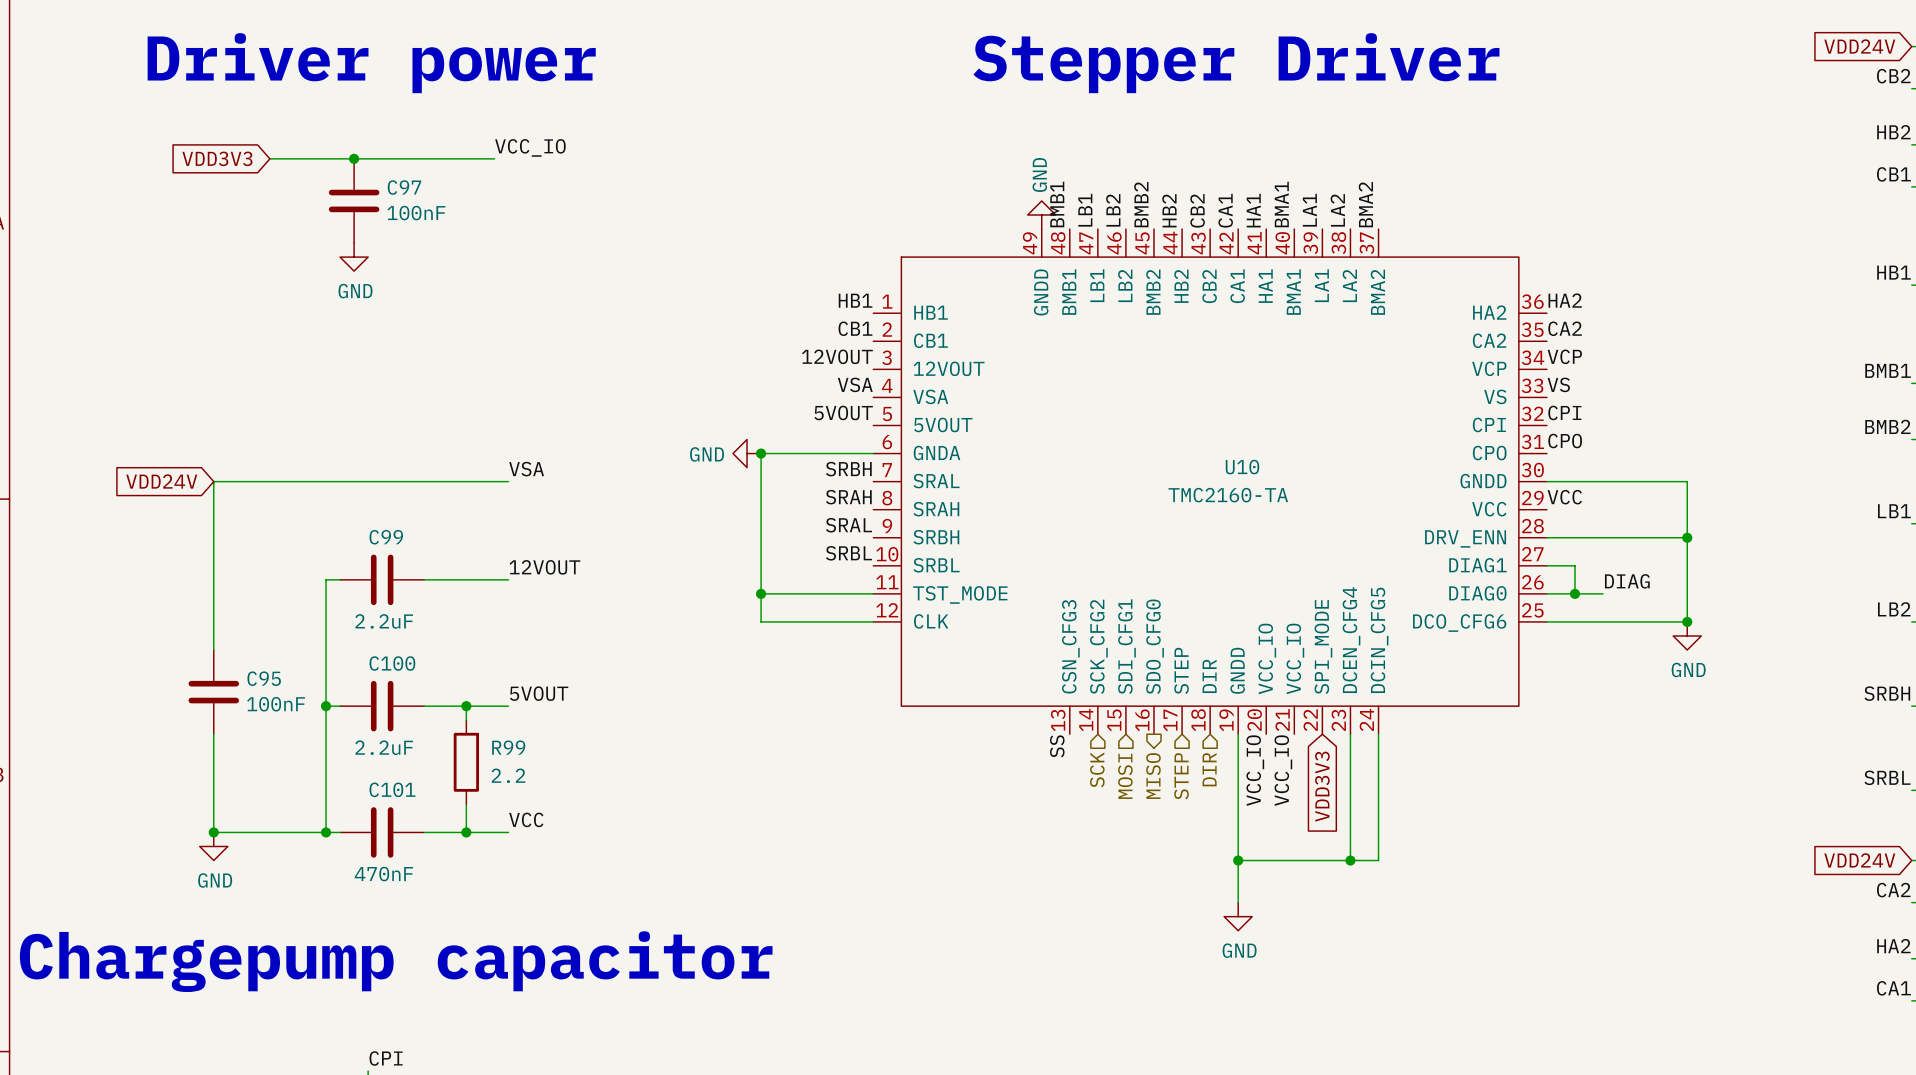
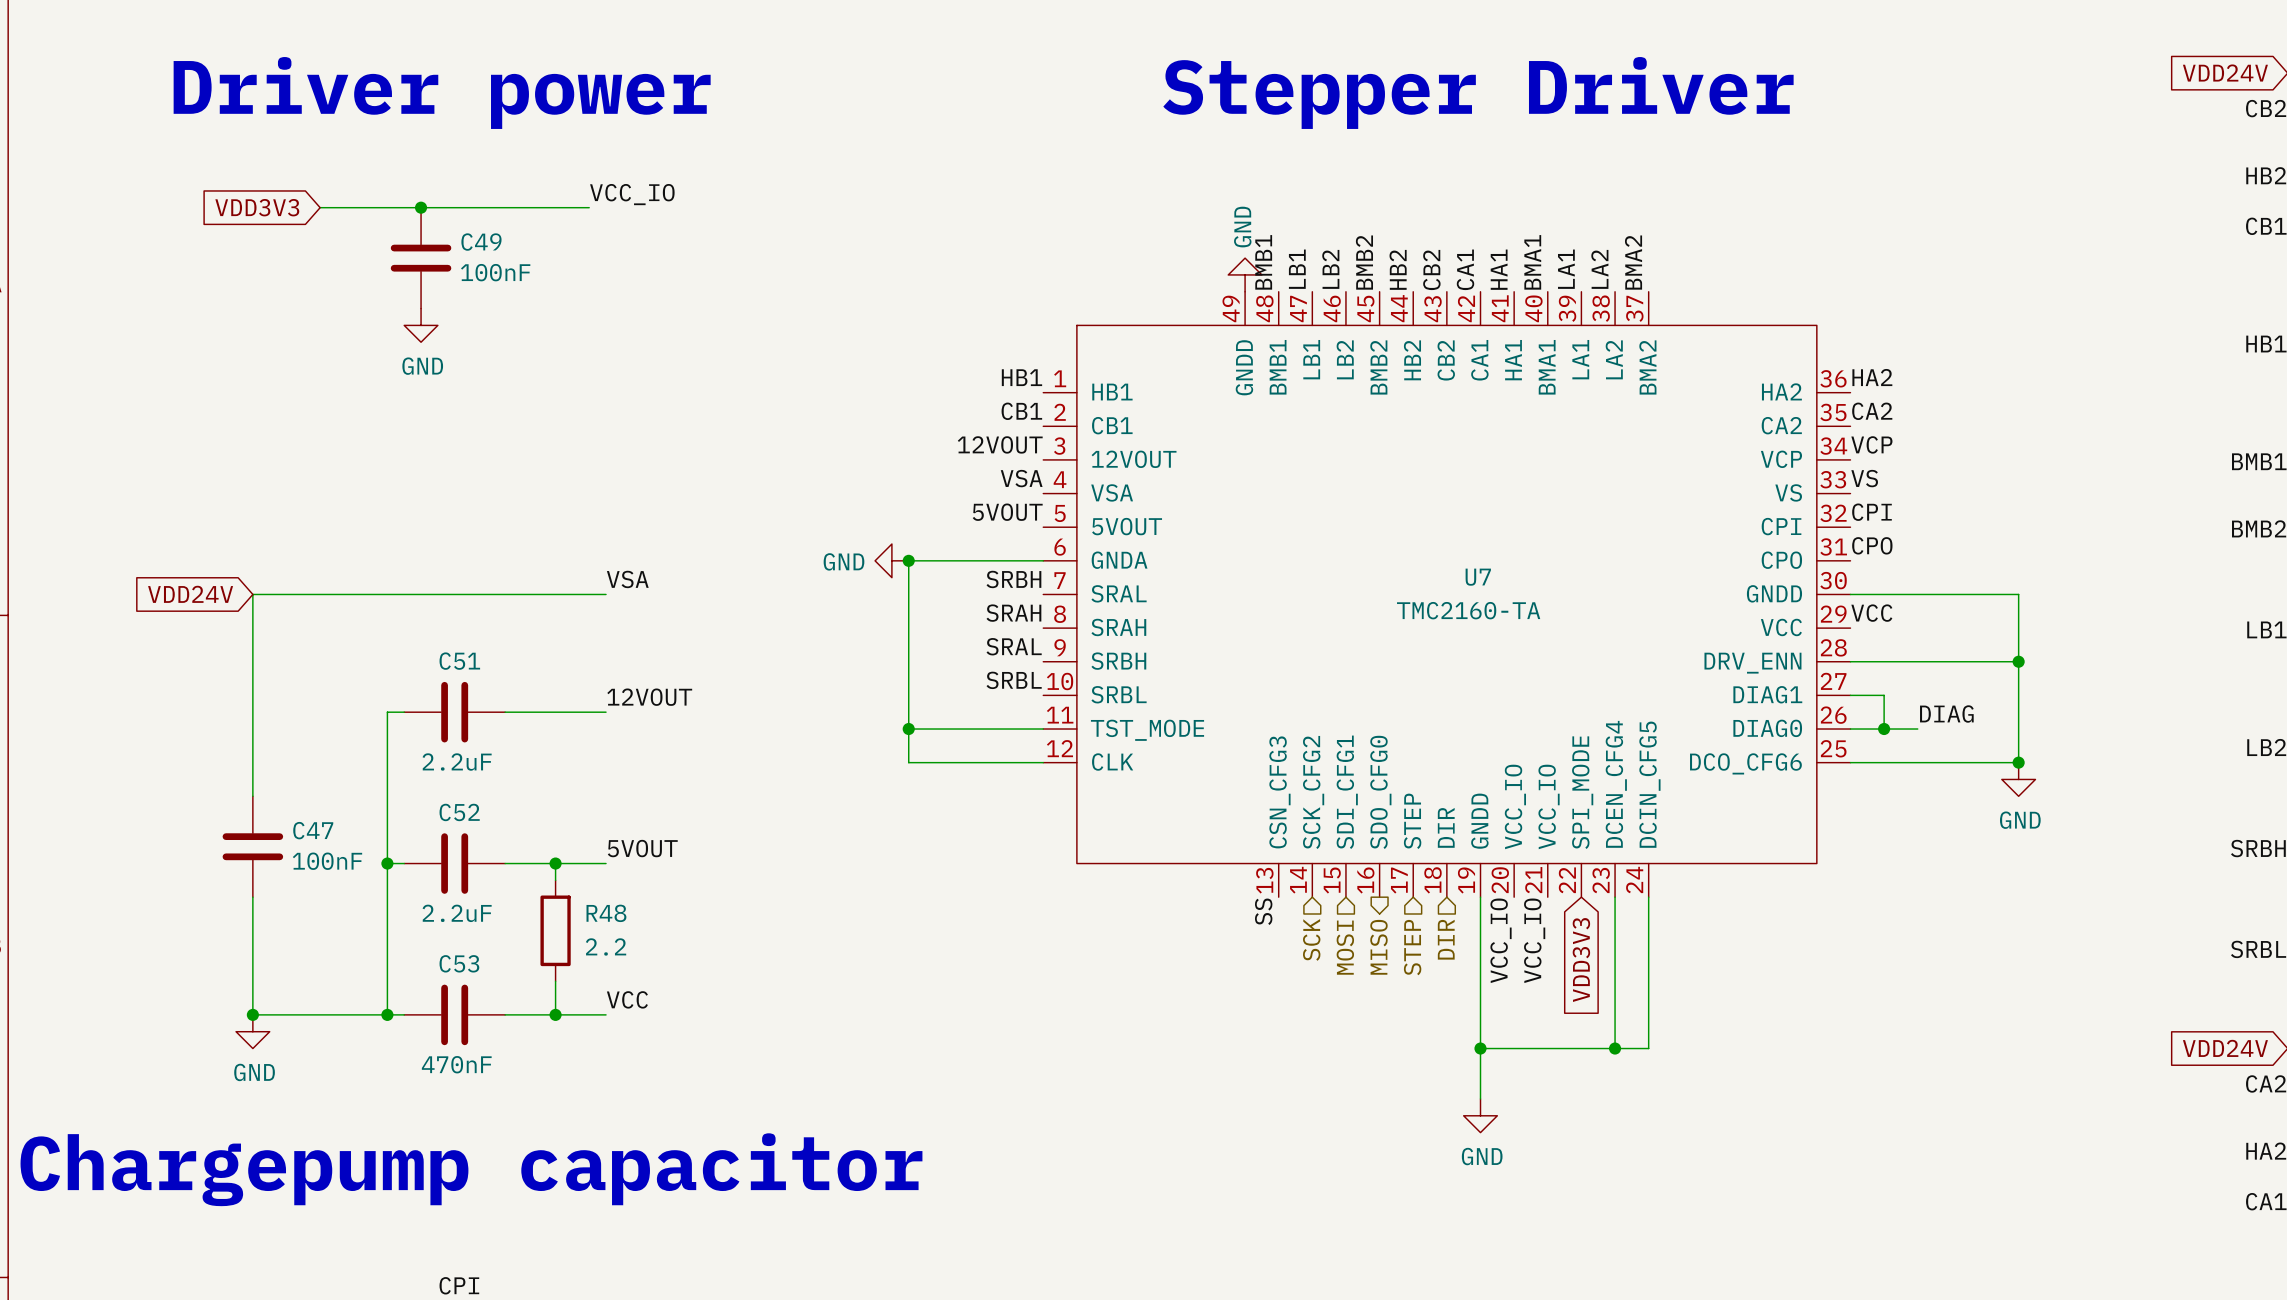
C97 name: C97 (404, 187) -> C49 (481, 242)
U10 name: U10 (1242, 467) -> U7 (1478, 577)
C99 name: C99 (386, 537) -> C51 (459, 661)
C100 name: C100 (392, 663) -> C52 (459, 812)
C95 name: C95 (264, 678) -> C47 (313, 830)
R99 name: R99 (508, 747) -> R48 (606, 913)
C101 name: C101 (392, 789) -> C53 (459, 963)

